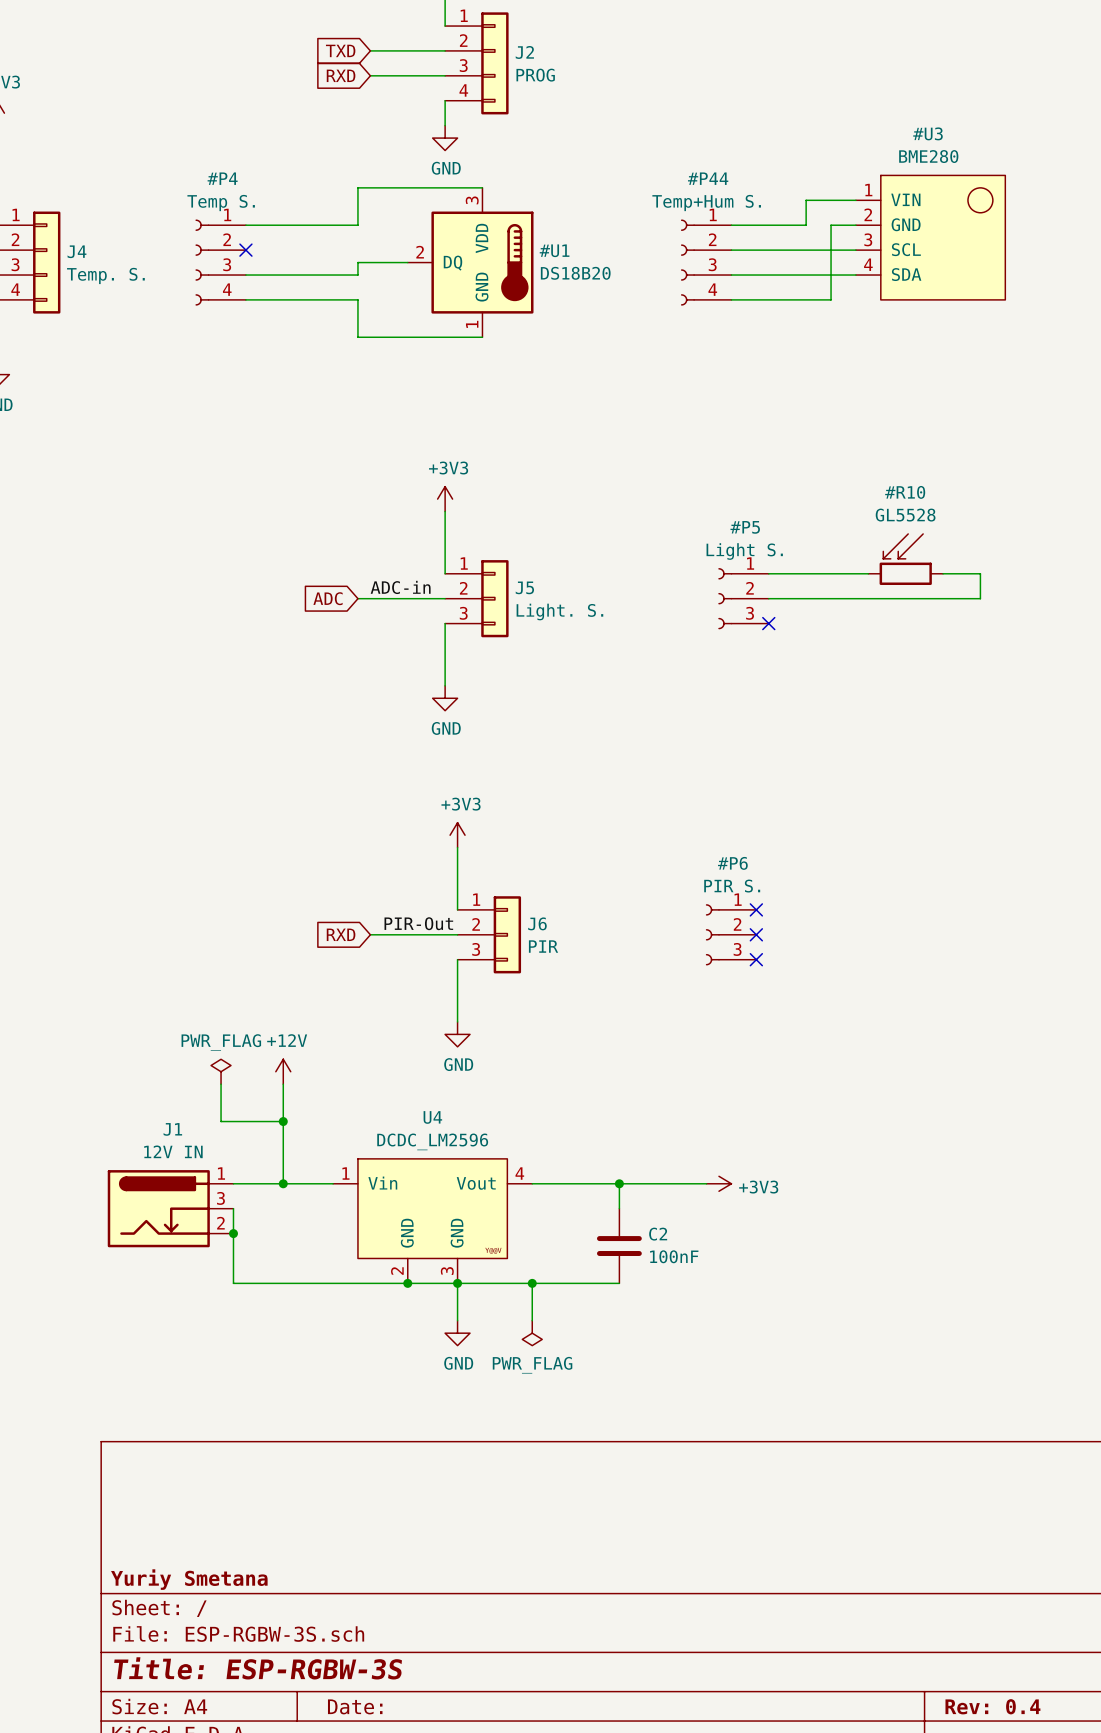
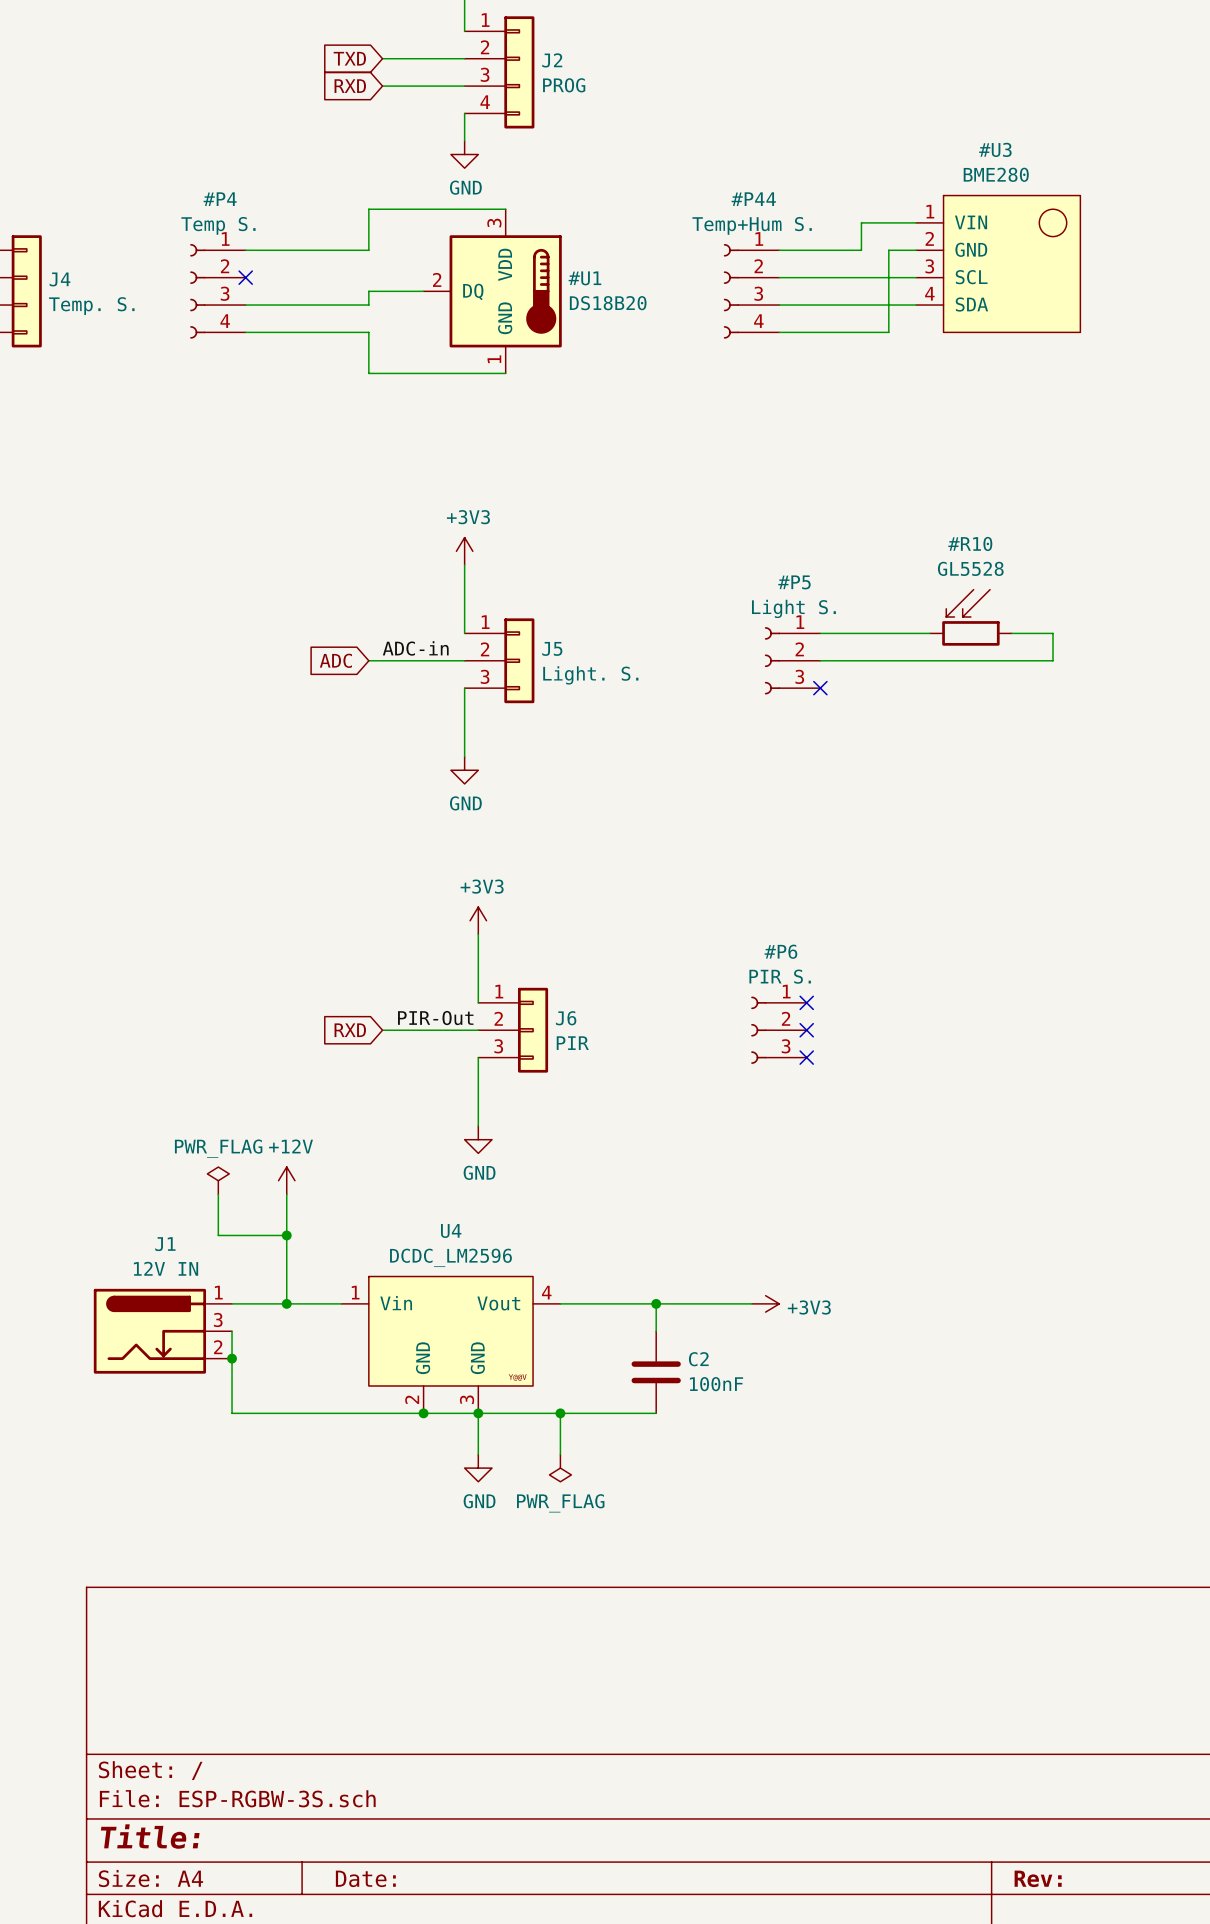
title block: Yuriy Smetana (189, 1579) -> none
title block: Title: ESP-RGBW-3S (258, 1668) -> Title: (150, 1836)
title block: Rev: 0.4 (992, 1706) -> Rev: (1038, 1878)

